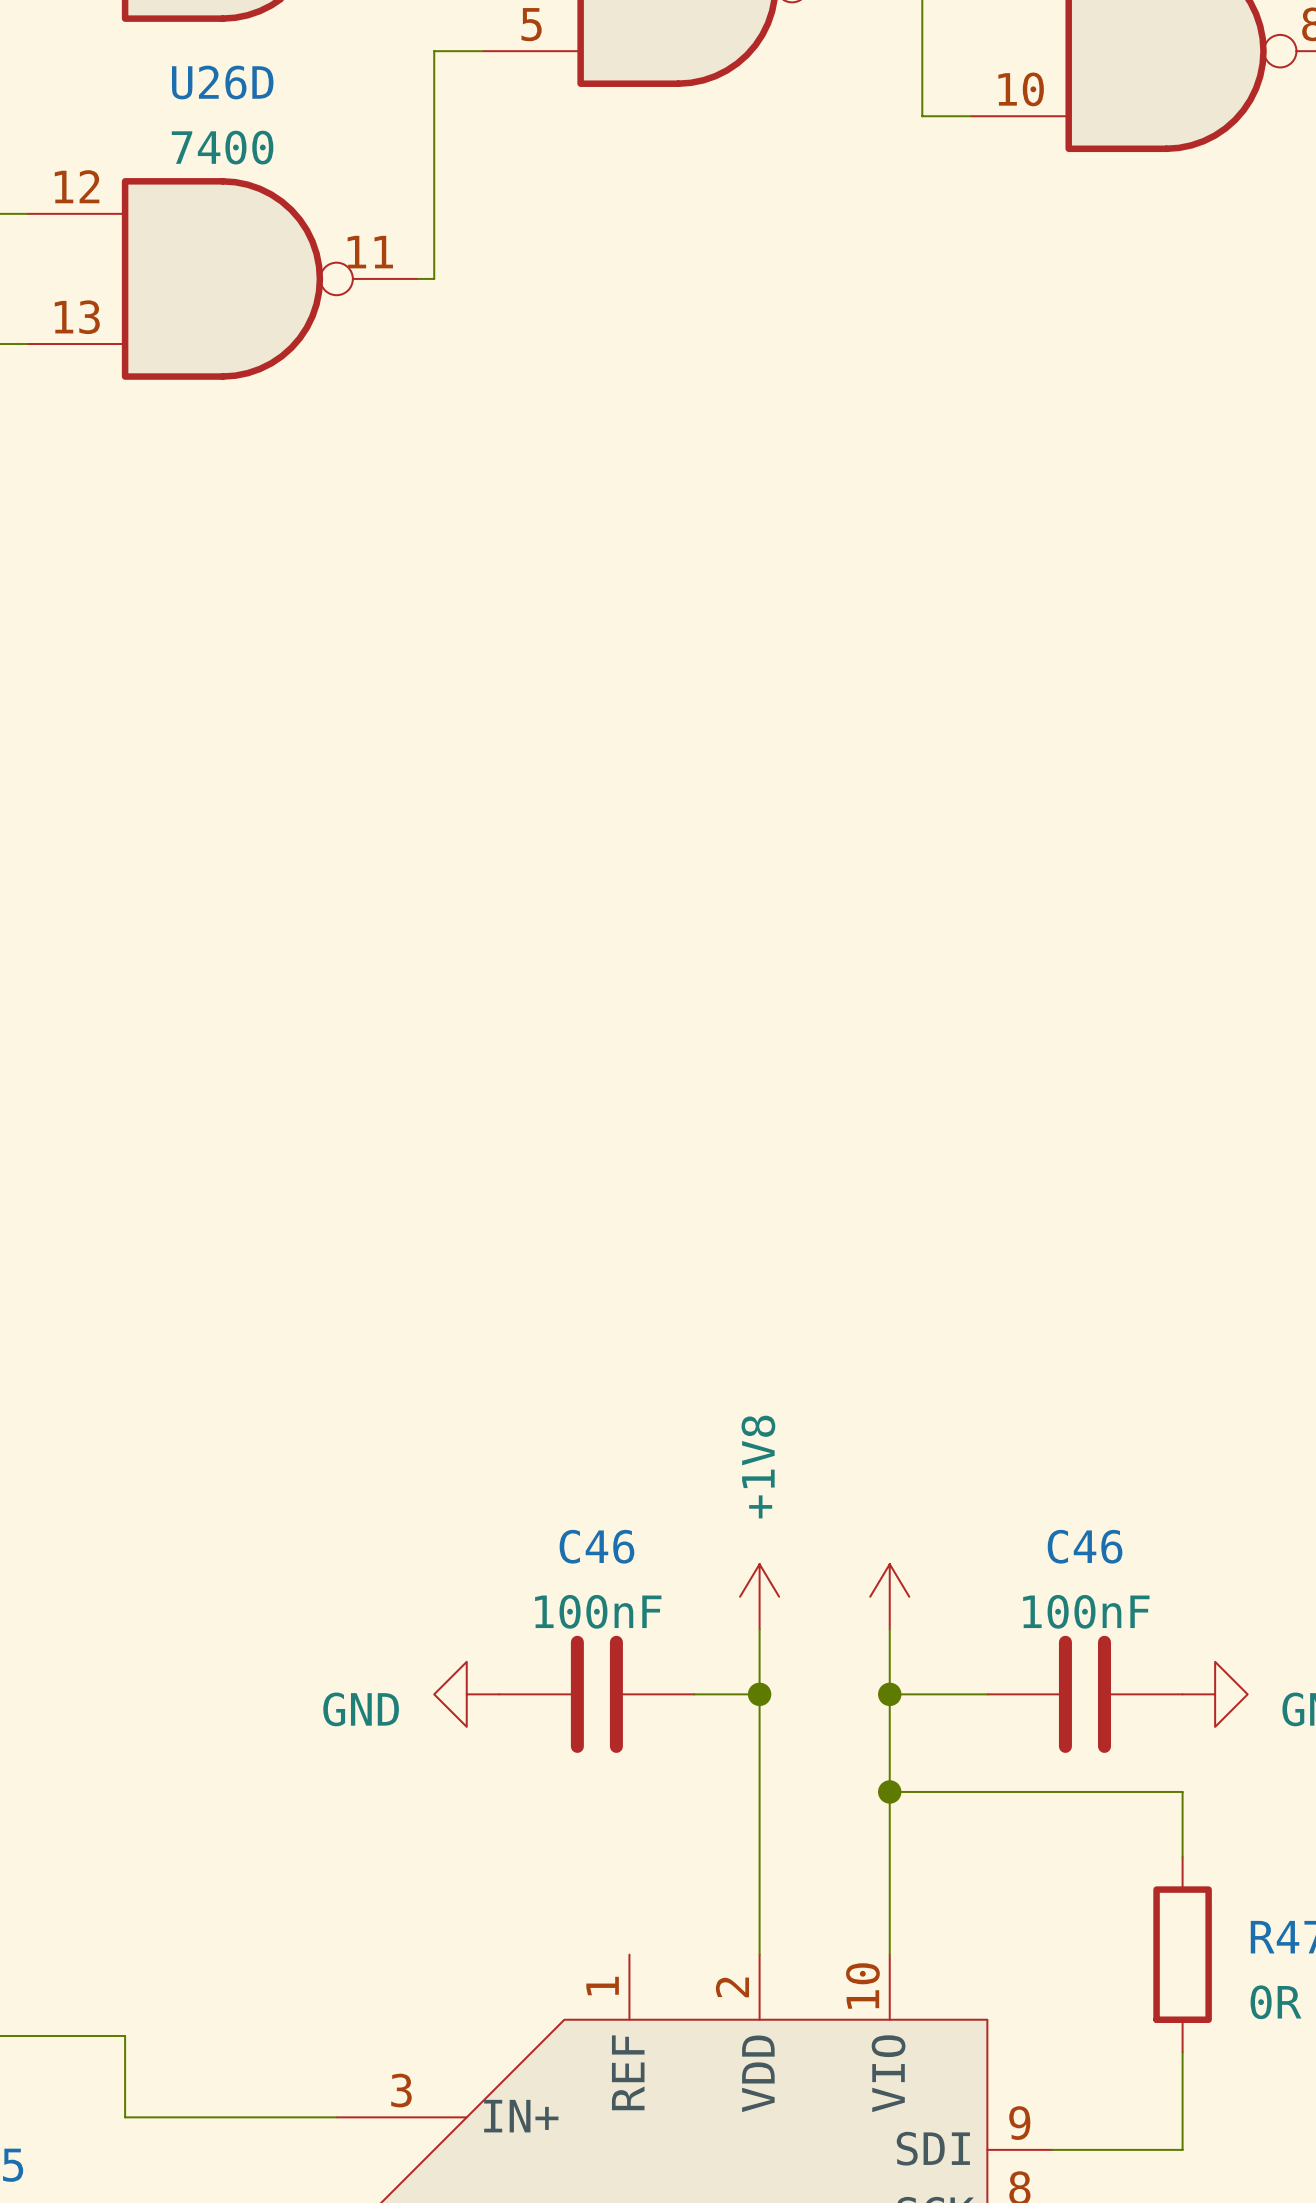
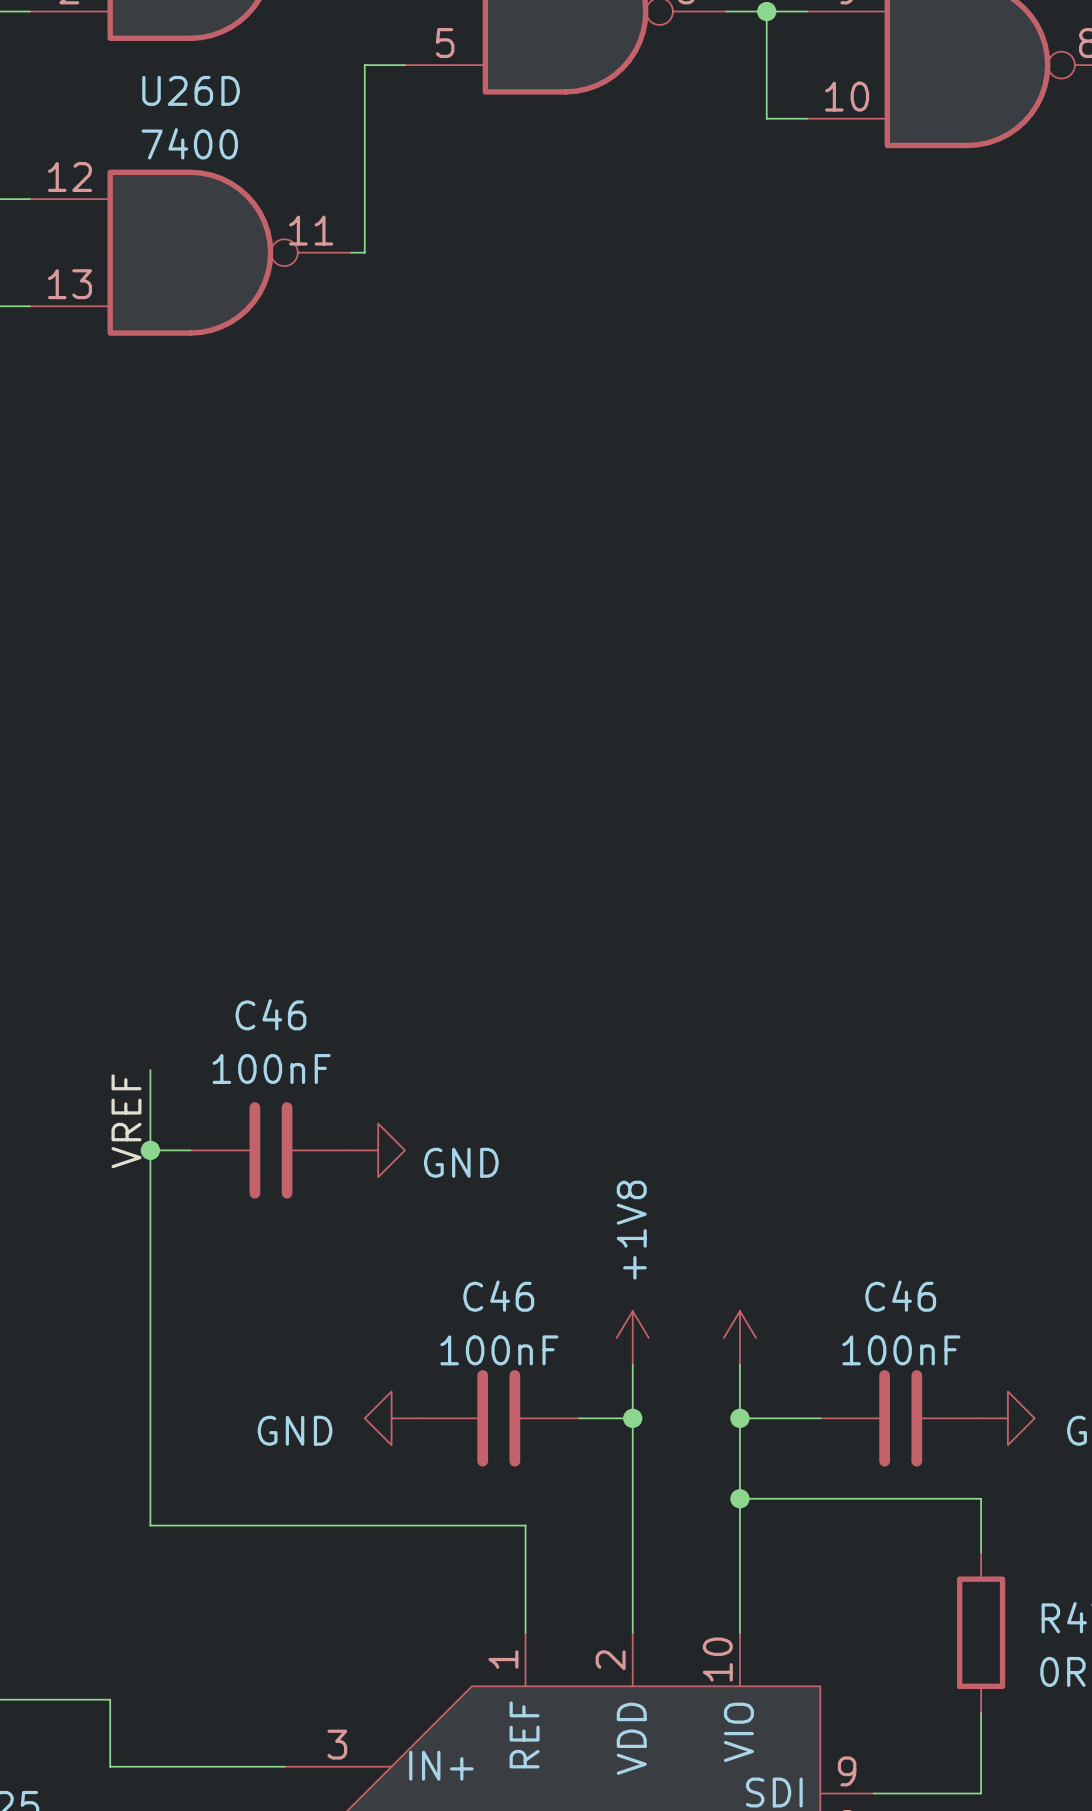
wire: none -> (150, 1069) (150, 1525) (525, 1525) (525, 1632)
label: none -> VREF (126, 1121)
wire: none -> (150, 1150) (190, 1150)
junction: none -> (150, 1150)
C46: none -> 100nF (270, 1150)
power symbol: none -> GND (378, 1150)

